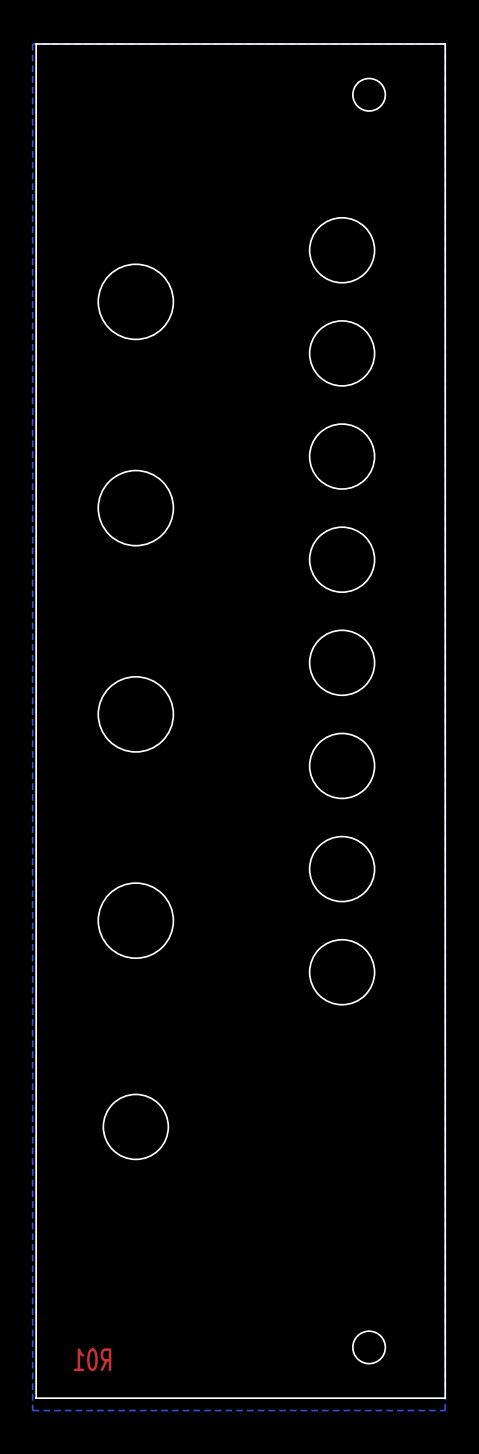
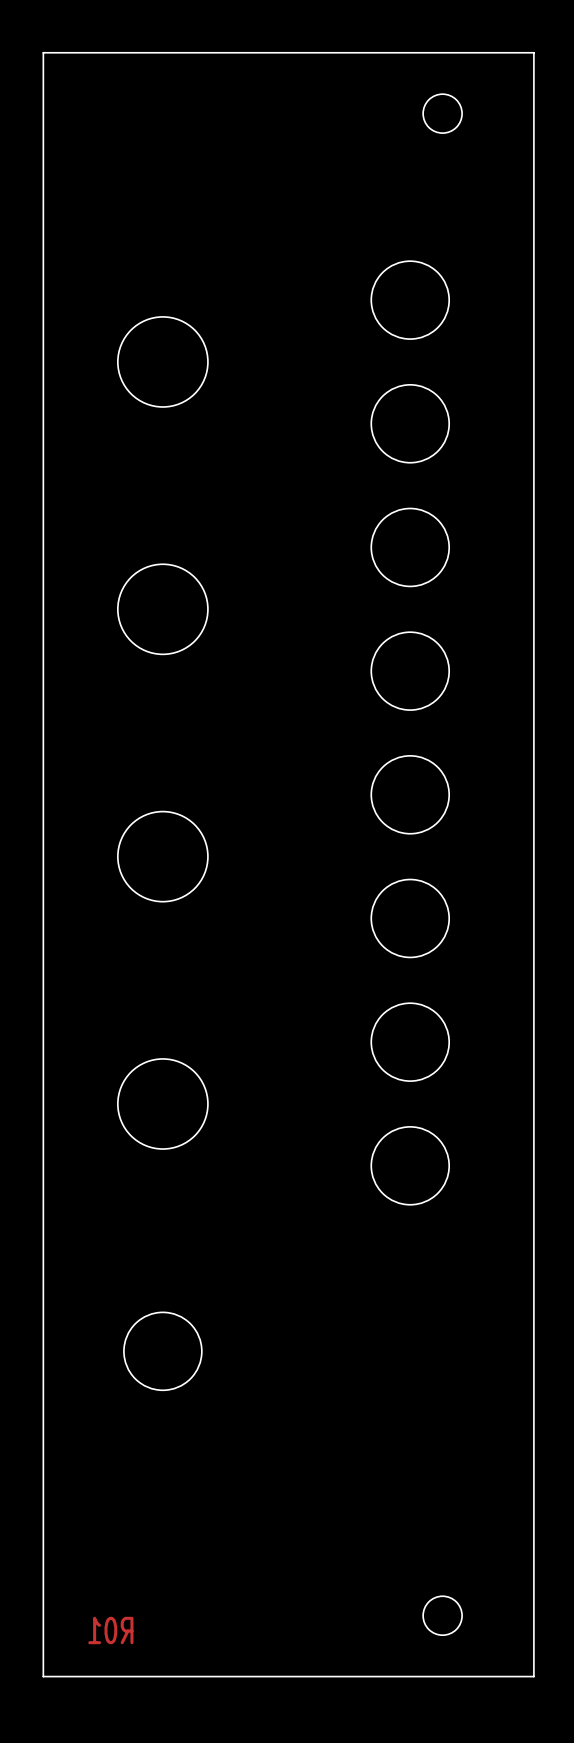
bottom zone outline: (445, 44) (445, 1410) (32, 1410) (32, 44) (445, 44) -> none

